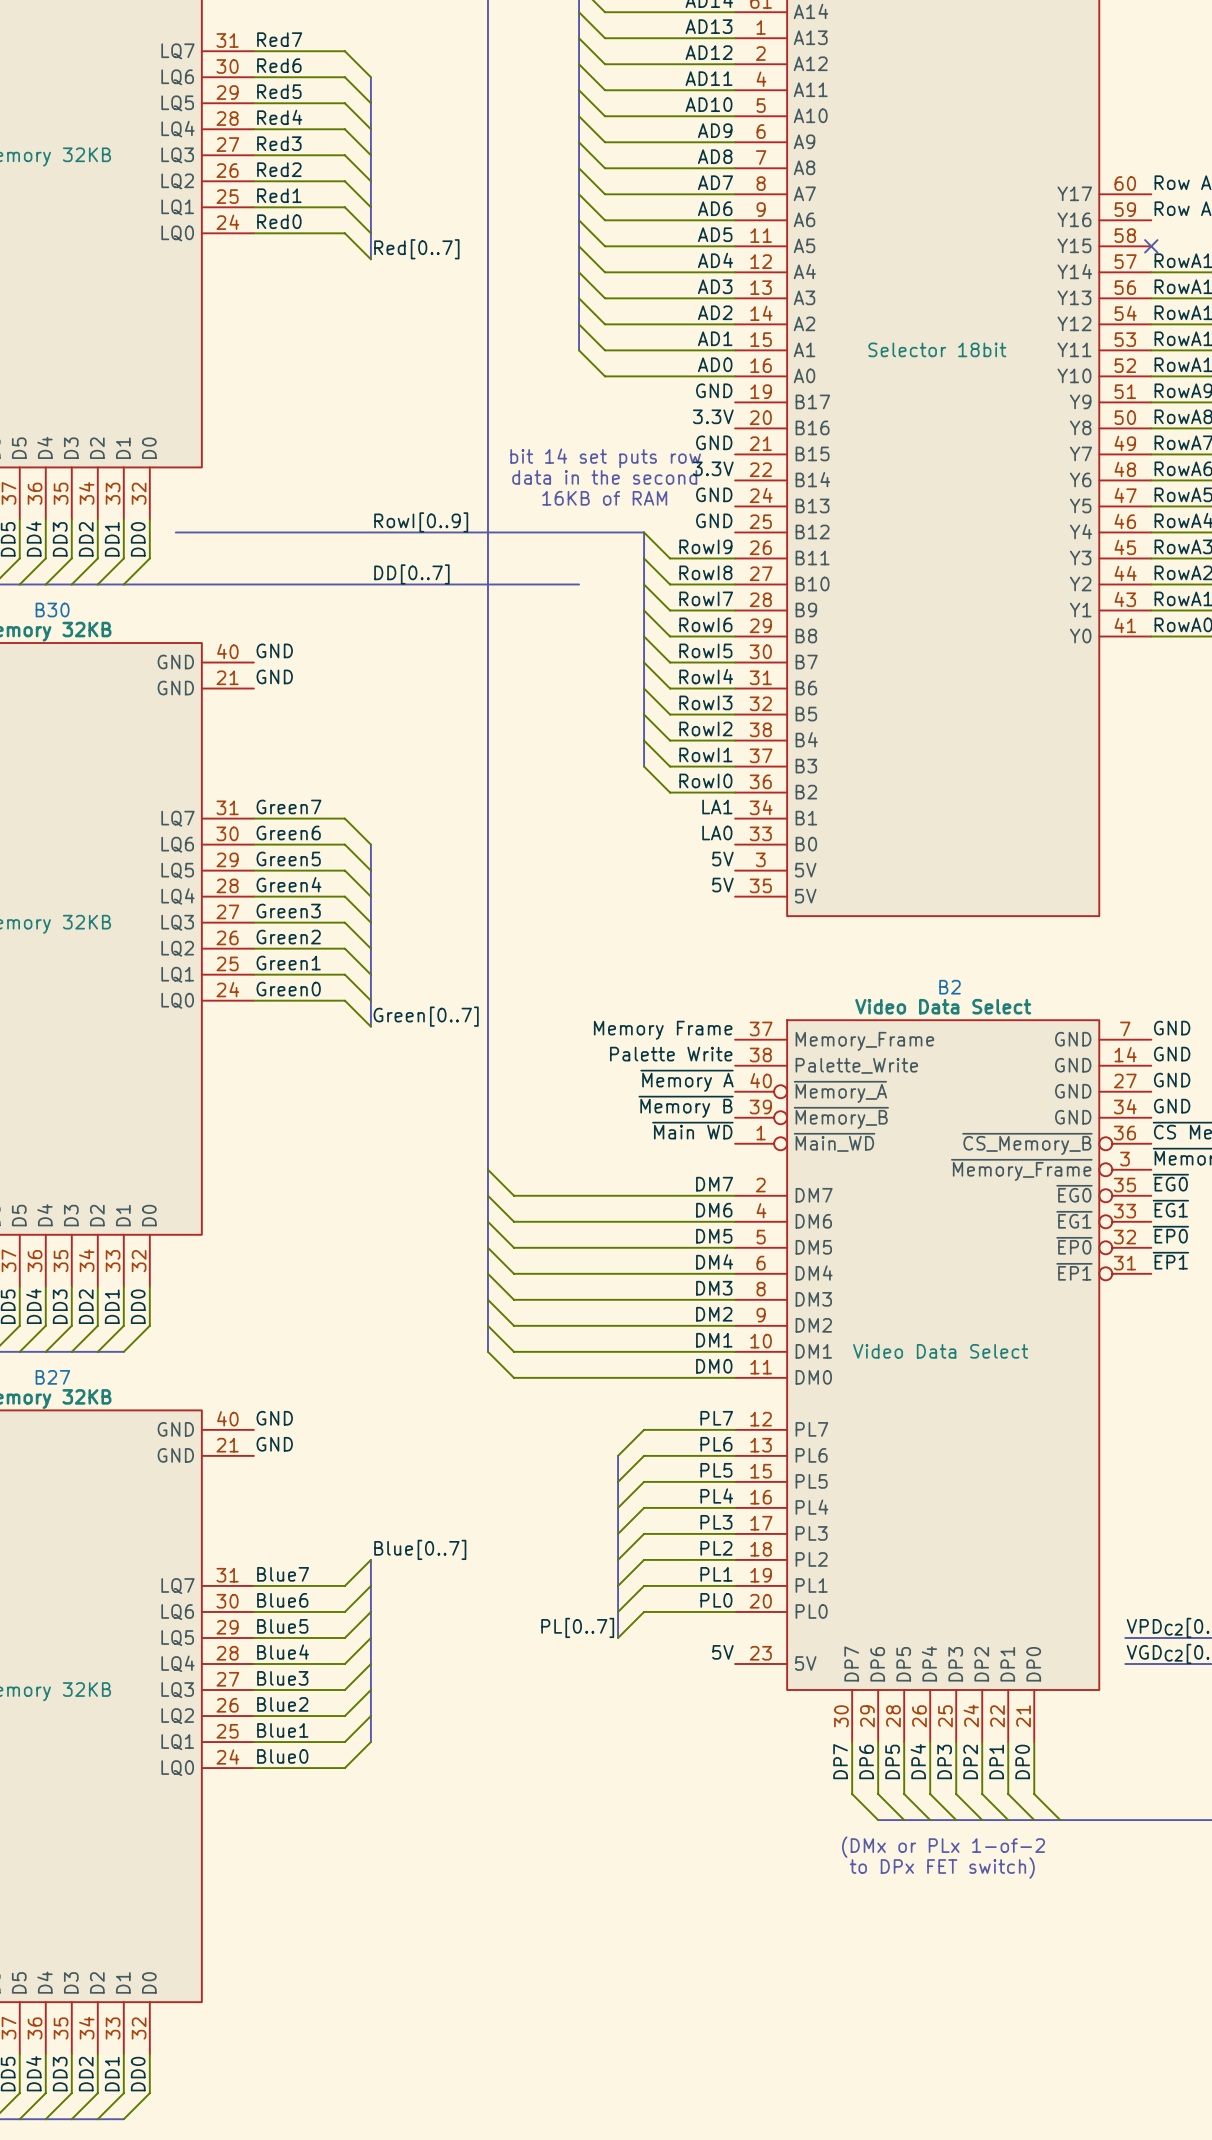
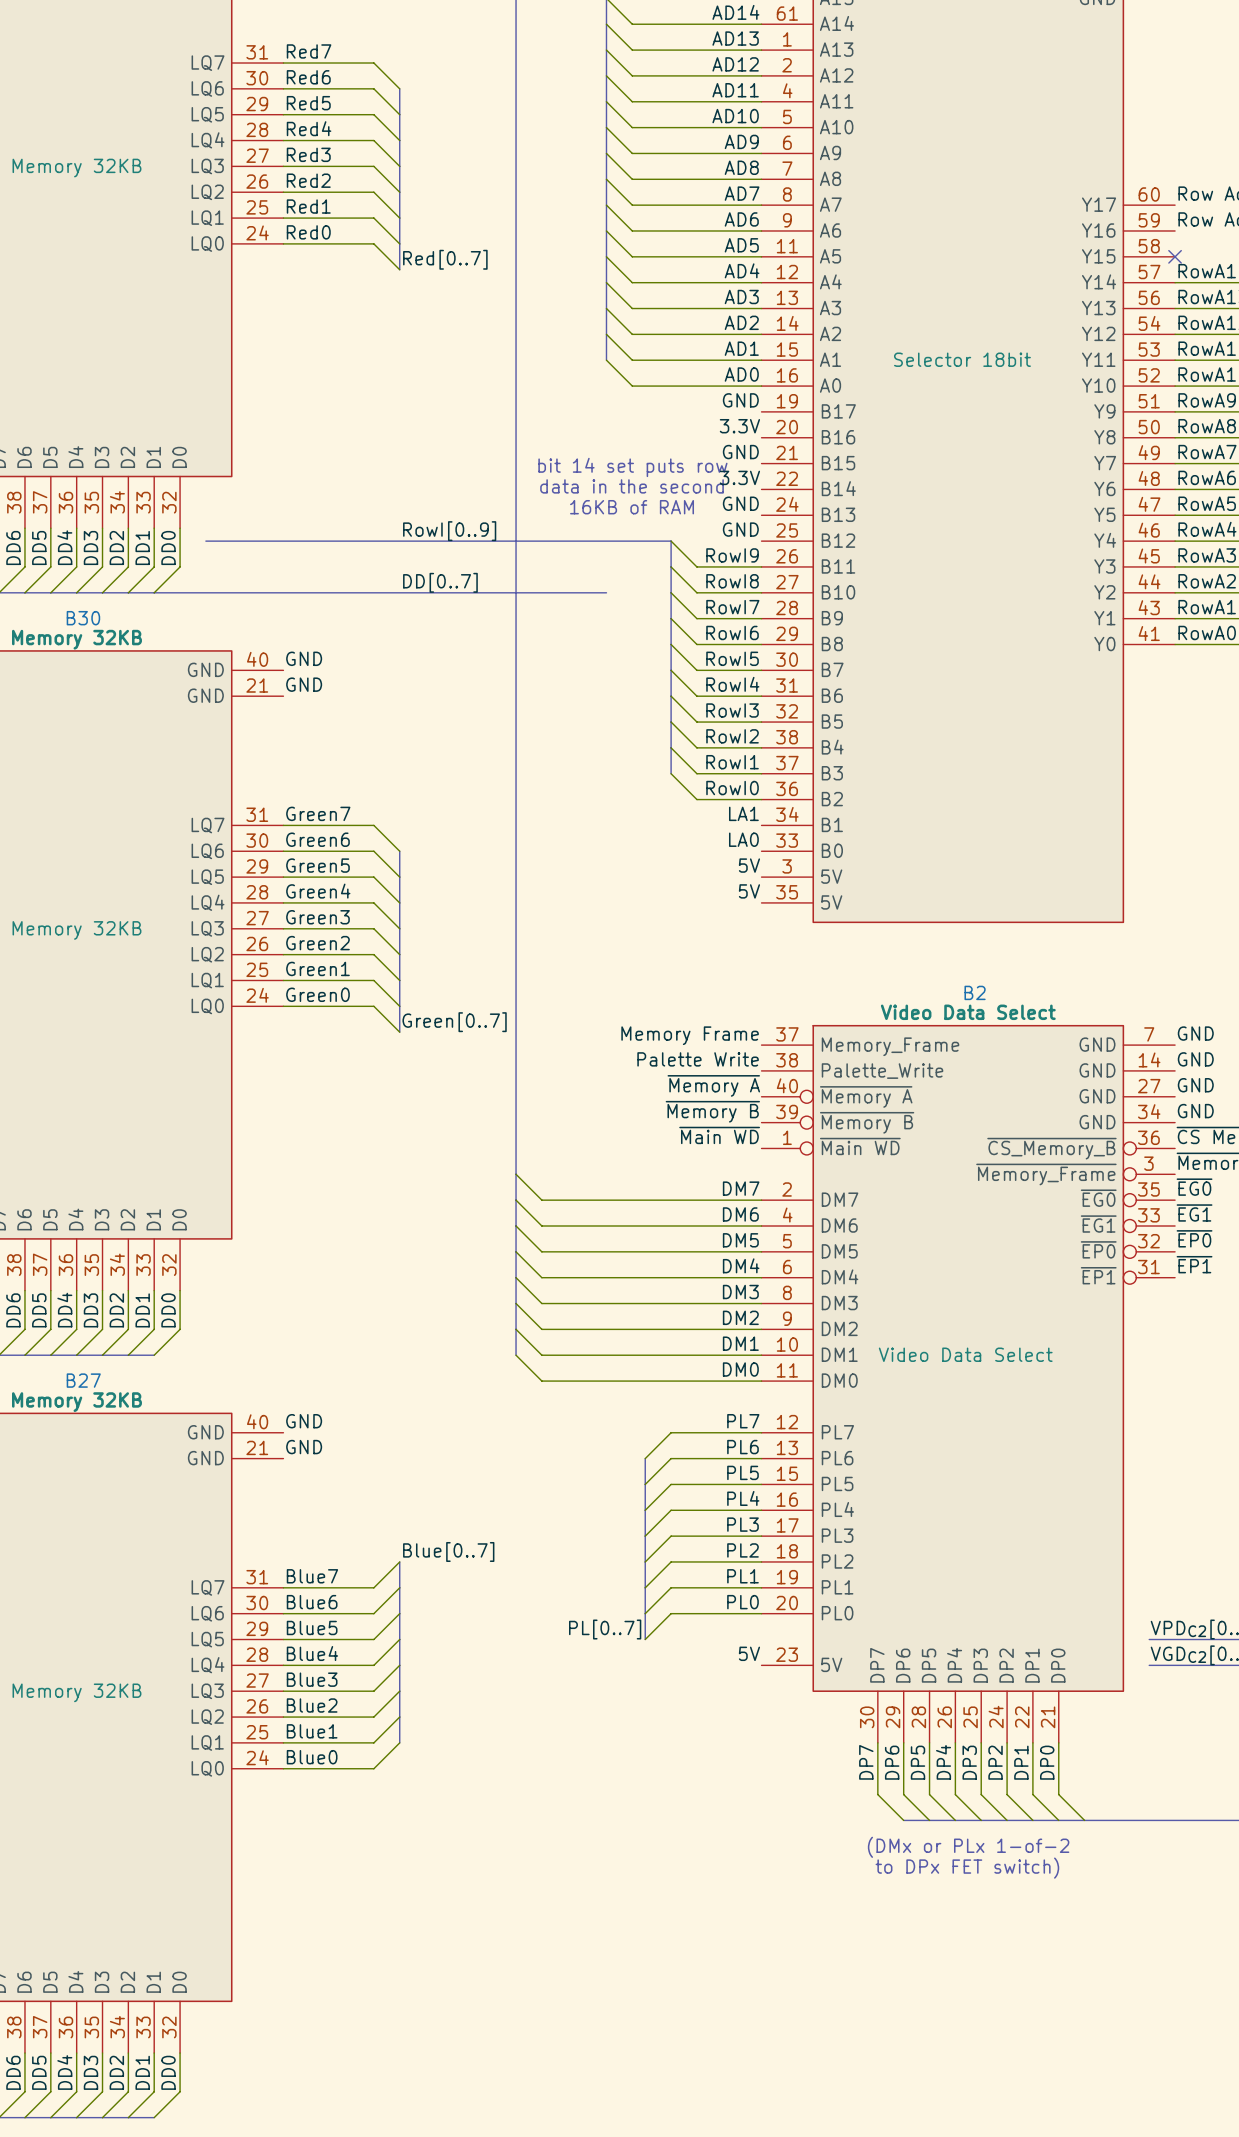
B2 pin name: ~{Memory_A} (840, 1091) -> ~{Memory A} (866, 1096)
B2 pin name: ~{Memory_B} (841, 1117) -> ~{Memory B} (867, 1122)
B2 pin name: ~{Main_WD} (834, 1142) -> ~{Main WD} (860, 1146)

